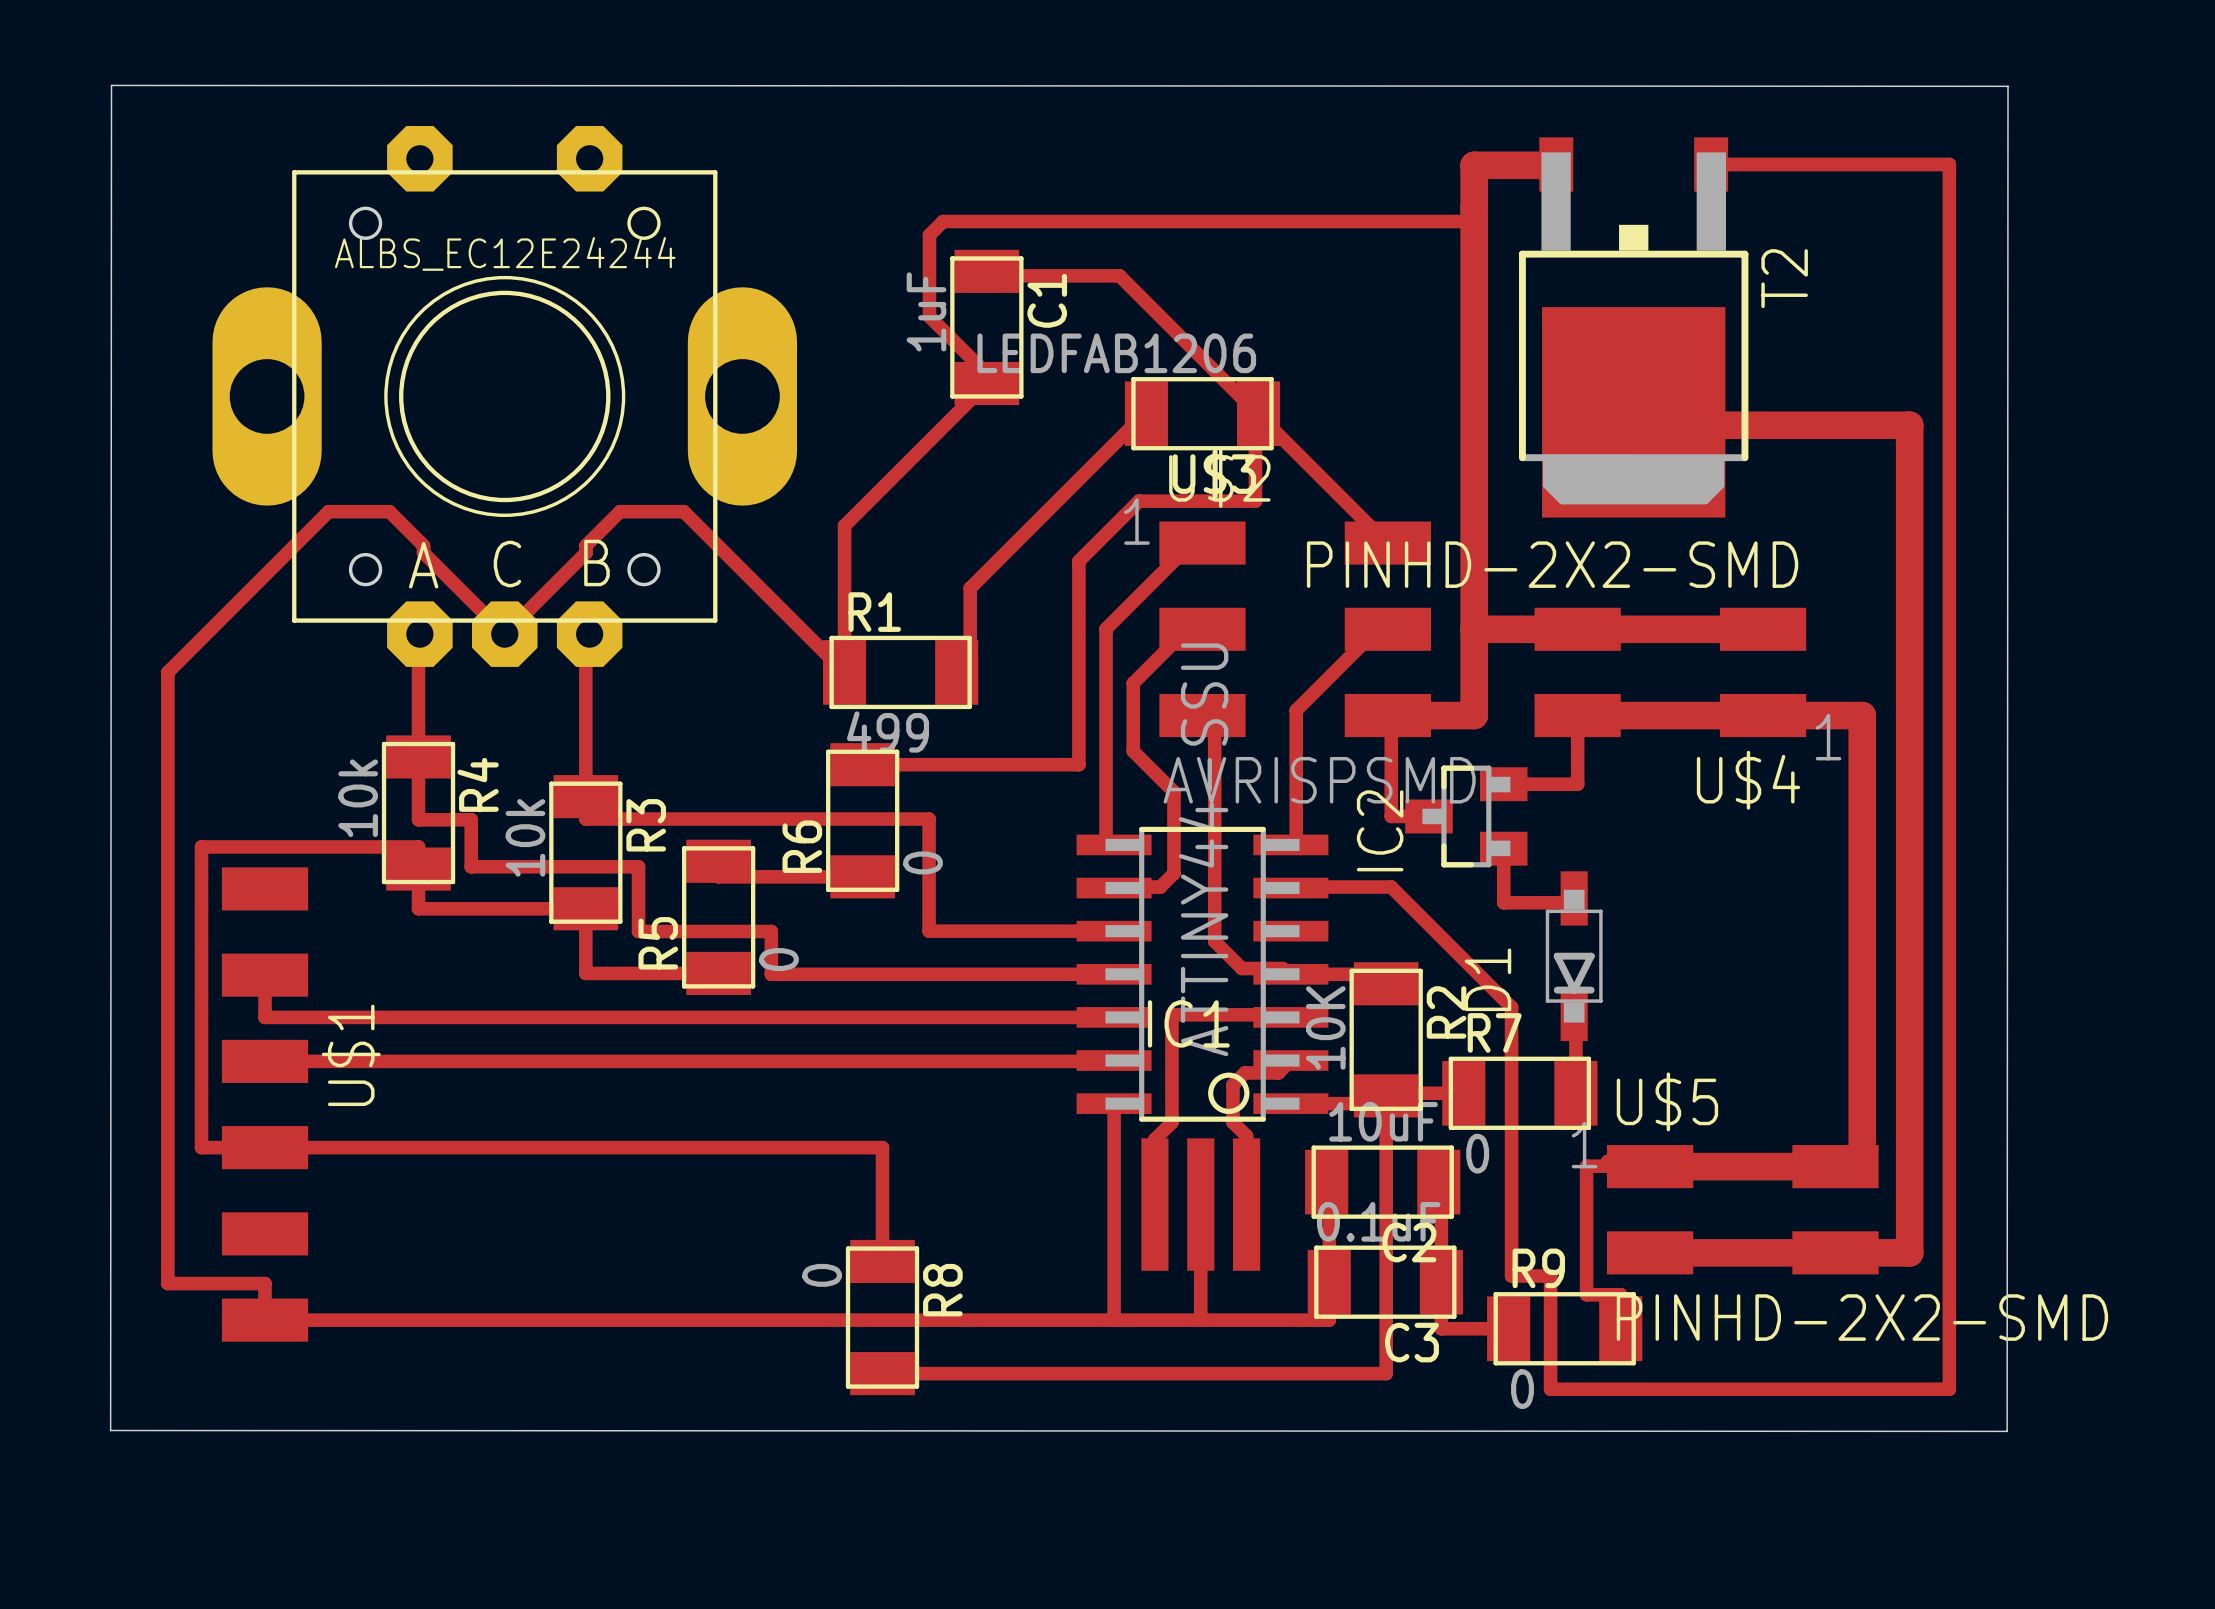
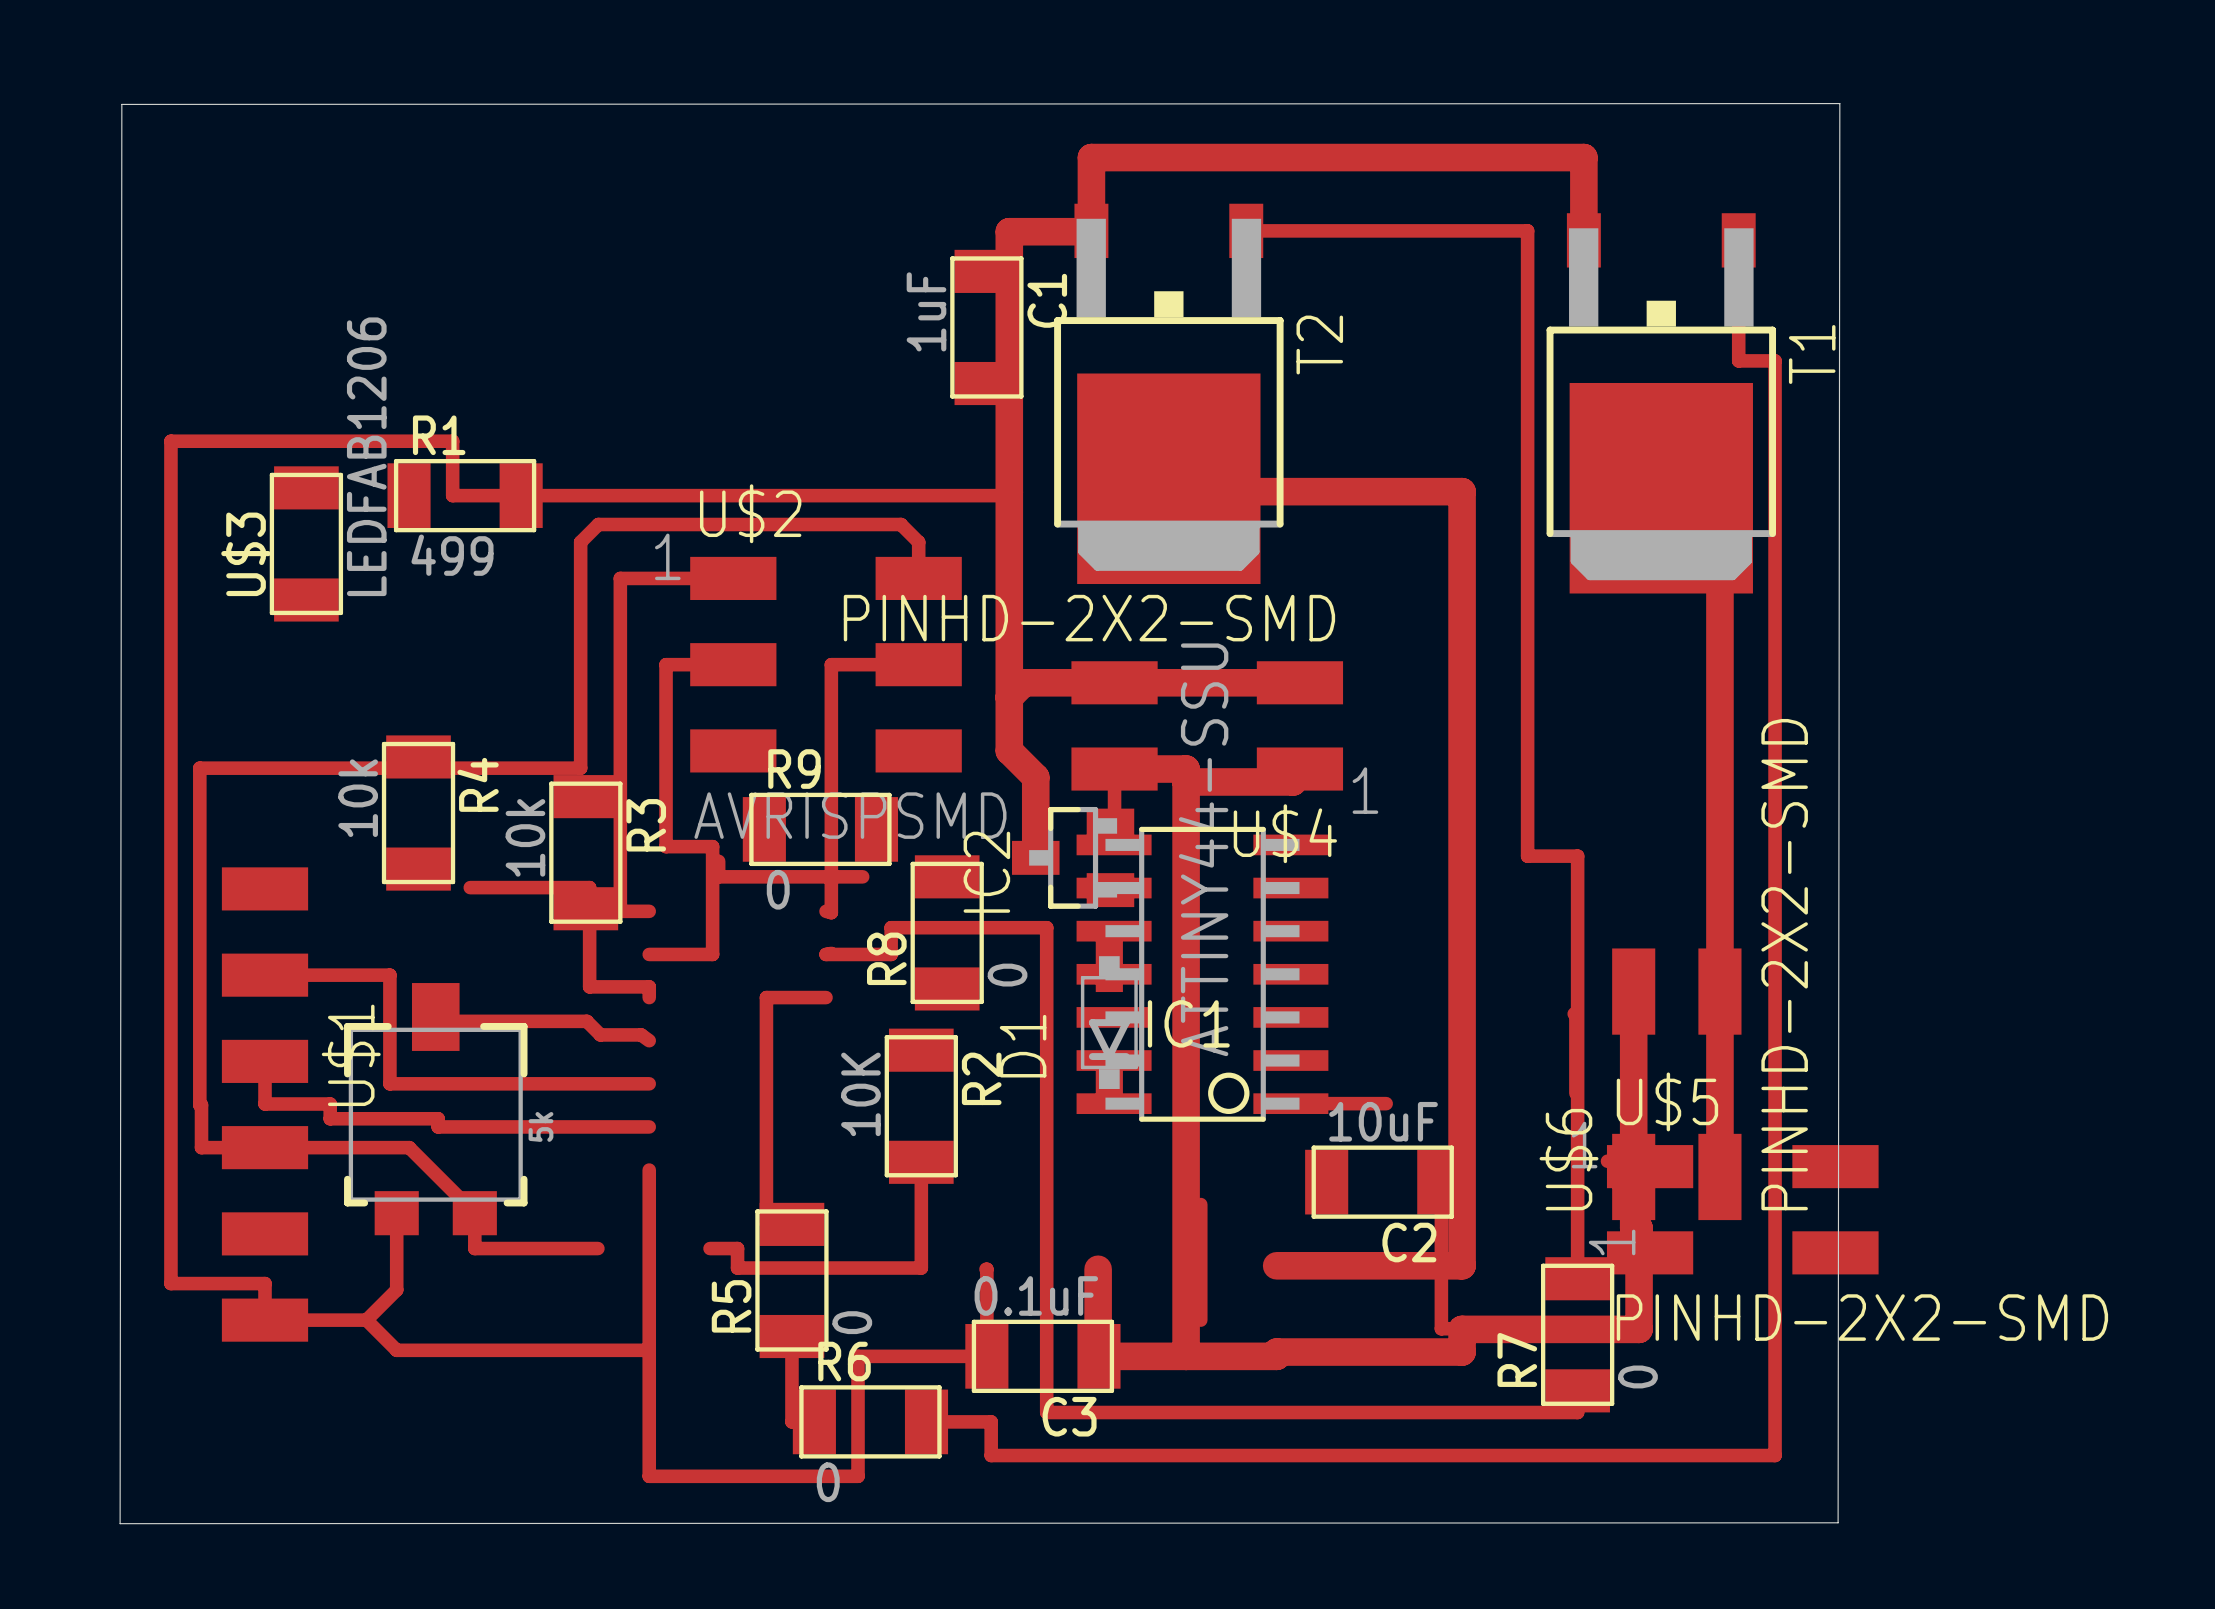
board edge: (111, 85) (2008, 86) (2007, 1431) (110, 1430) (111, 85) -> (1839, 103) (121, 104) (120, 1523) (1838, 1522) (1839, 103)
T2 footprint: [1518, 137, 1749, 518] -> [1054, 203, 1284, 585]
top track: (1556, 164) (1474, 165) (1474, 715) (1387, 715) (1391, 710) (1391, 816) (1429, 816) -> none
top track: (1711, 164) (1949, 164) (1949, 1389) (1550, 1389) (1550, 1276) (1511, 1276) (1511, 1007) (1391, 887) (1290, 888) -> none
top track: (1474, 208) (1474, 221) (943, 221) (929, 235) (929, 316) (983, 370) (986, 383) (844, 525) (844, 672) (683, 511) (619, 511) (586, 545) (586, 552) (504, 634) (423, 552) (423, 545) (389, 511) (328, 511) (167, 672) (167, 1283) (170, 1283) -> (1009, 492) (1009, 495) (452, 495) (452, 441) (170, 441) (170, 1283)
top track: none -> (1246, 230) (1527, 230) (1527, 856) (1577, 856) (1577, 1278)
top track: none -> (1583, 240) (1583, 157) (1091, 157) (1091, 231) (1009, 231) (1009, 750) (1035, 777) (1035, 857)
top track: none -> (1738, 240) (1738, 360) (1775, 360) (1775, 1455) (991, 1455) (991, 1421) (926, 1421)
top track: (986, 271) (997, 275) (1119, 275) (1255, 411) -> none
part: (504, 396) -> none
T1: none -> (1661, 403)
top track: (1255, 411) (1387, 543) -> none
top track: (1255, 411) (1255, 501) (1138, 501) (1078, 561) (1078, 764) (862, 764) -> none
top track: (1633, 412) (1635, 425) (1909, 425) (1909, 1252) (1650, 1252) -> none
top track: (1146, 413) (970, 588) (970, 669) (956, 672) -> none
U$3 rotation: 0° (1202, 413) -> 90° clockwise (306, 543)
U$3 position: (1202, 413) -> (306, 543)
top track: none -> (1168, 478) (1168, 491) (1462, 491) (1462, 1265) (1276, 1265)
top track: none -> (1661, 488) (1719, 488) (1719, 1176)
top track: (1202, 543) (1201, 533) (1106, 628) (1106, 846) (1114, 844) -> none
top track: none -> (733, 578) (620, 578) (620, 911) (649, 911)
top track: (1202, 629) (1201, 642) (1173, 642) (1133, 683) (1133, 751) (1173, 791) (1173, 873) (1160, 887) (1114, 888) -> none
U$2 position: (1295, 629) -> (826, 664)
top track: (1387, 629) (1377, 628) (1296, 710) (1296, 846) (1290, 844) -> none
top track: (1474, 629) (1763, 629) -> none
top track: (419, 634) (418, 819) (471, 819) (471, 866) (638, 866) (638, 931) (771, 931) (771, 974) (1114, 974) -> none
top track: (589, 634) (585, 634) (585, 819) (929, 819) (929, 931) (1114, 931) -> none
top track: none -> (733, 664) (666, 664) (666, 846) (712, 846) (712, 954) (649, 954)
top track: none -> (918, 664) (831, 664) (831, 912) (826, 911)
R1 position: (900, 672) -> (465, 495)
U$4 position: (1670, 672) -> (1207, 725)
top track: none -> (1299, 682) (1023, 682) (1009, 697)
top track: (1202, 715) (1214, 724) (1214, 941) (1241, 968) (1282, 968) (1290, 974) (1386, 974) (1386, 983) -> none
top track: none -> (1299, 769) (1293, 762) (1293, 781) (1186, 781)
top track: (1503, 784) (1577, 784) (1577, 715) (1757, 715) (1757, 710) (1763, 715) (1862, 715) (1862, 1165) (1835, 1166) -> none
IC2 position: (1466, 816) -> (1073, 857)
R6 rotation: 0° (862, 820) -> 90° clockwise (870, 1421)
R6 position: (862, 820) -> (870, 1421)
top track: none -> (1110, 825) (1114, 825) (1114, 769) (1186, 769) (1186, 1356)
top track: (1503, 848) (1503, 902) (1574, 902) (1574, 898) -> none
top track: none -> (470, 887) (589, 887) (589, 986) (649, 986) (649, 997)
R5 position: (718, 917) -> (791, 1280)
top track: none -> (831, 953) (826, 954) (891, 954) (891, 927) (1046, 927) (1046, 1412) (1577, 1412) (1577, 1390)
D1 position: (1574, 956) -> (1109, 1022)
top track: (718, 973) (585, 973) (585, 908) (418, 908) (418, 846) (201, 846) (201, 1105) -> (908, 569) (918, 578) (918, 542) (900, 524) (598, 524) (580, 542) (580, 768) (199, 768) (199, 1105) (201, 1105)
top track: (265, 975) (265, 1017) (1114, 1017) -> (265, 975) (389, 975) (389, 1083) (649, 1083)
top track: none -> (1633, 991) (1633, 1228) (1639, 1228) (1639, 1329) (1462, 1329) (1462, 1352) (1276, 1352) (1276, 1356) (1098, 1356) (1098, 1269)
top track: none -> (826, 997) (766, 997) (766, 1224) (791, 1224)
top track: none -> (435, 1016) (437, 1021) (586, 1021) (600, 1034) (641, 1034) (649, 1040)
top track: (1290, 1017) (1288, 1014) (1171, 1014) (1171, 1122) (1154, 1139) (1154, 1204) -> none
R7 name position: R7 (1494, 1032) -> R7 (1517, 1359)
R2 position: (1386, 1039) -> (921, 1106)
top track: (265, 1060) (1114, 1060) -> (265, 1061) (265, 1104) (330, 1104) (330, 1118) (438, 1118) (438, 1126) (649, 1126)
top track: (1290, 1060) (1278, 1072) (1244, 1072) (1232, 1084) (1232, 1122) (1246, 1136) (1246, 1204) -> none
U$6: none -> PINHD-2X2-SMD (1676, 1084)
top track: (1463, 1093) (1386, 1093) (1386, 1373) (882, 1373) -> none
R7 rotation: 0° (1519, 1093) -> 90° clockwise (1577, 1334)
R7 position: (1519, 1093) -> (1577, 1334)
top track: (1114, 1103) (1114, 1320) -> none
part: none -> 5k (435, 1109)
top track: (409, 1147) (882, 1147) (882, 1261) -> (409, 1147) (474, 1213) (474, 1248) (597, 1248)
R7 value position: 0 (1477, 1153) -> 0 (1638, 1376)
top track: none -> (908, 1156) (921, 1162) (921, 1268) (737, 1268) (737, 1248) (710, 1248)
top track: (1646, 1166) (1586, 1166) (1586, 1294) (1620, 1294) (1620, 1328) -> none
top track: (1646, 1166) (1835, 1166) -> none
top track: none -> (649, 1170) (649, 1476) (858, 1476) (858, 1356) (986, 1356) (986, 1269)
top track: (1326, 1182) (1329, 1182) (1329, 1320) (366, 1320) -> none
part: (1200, 1204) -> none
top track: none -> (396, 1213) (396, 1289) (366, 1320) (396, 1350) (649, 1350)
R8 value position: 0 (822, 1275) -> 0 (1007, 975)
C3 position: (1385, 1282) -> (1042, 1356)
R8 name position: R8 (942, 1290) -> R8 (886, 958)
R8 position: (882, 1317) -> (947, 932)
R9 position: (1564, 1328) -> (820, 829)
top track: none -> (791, 1336) (791, 1421) (814, 1421)

